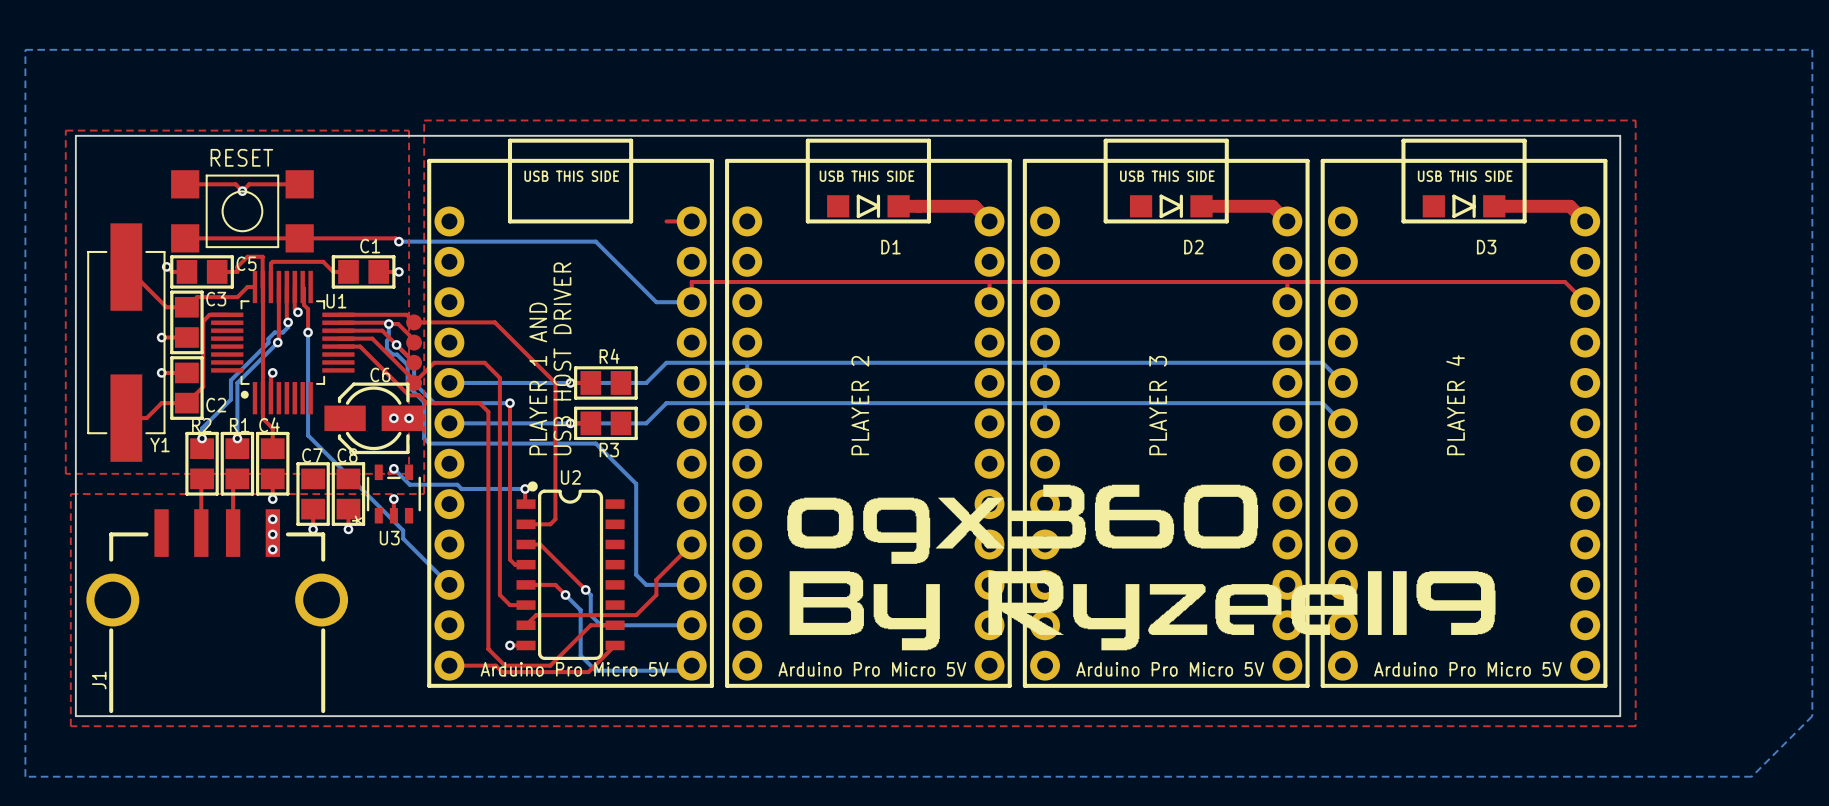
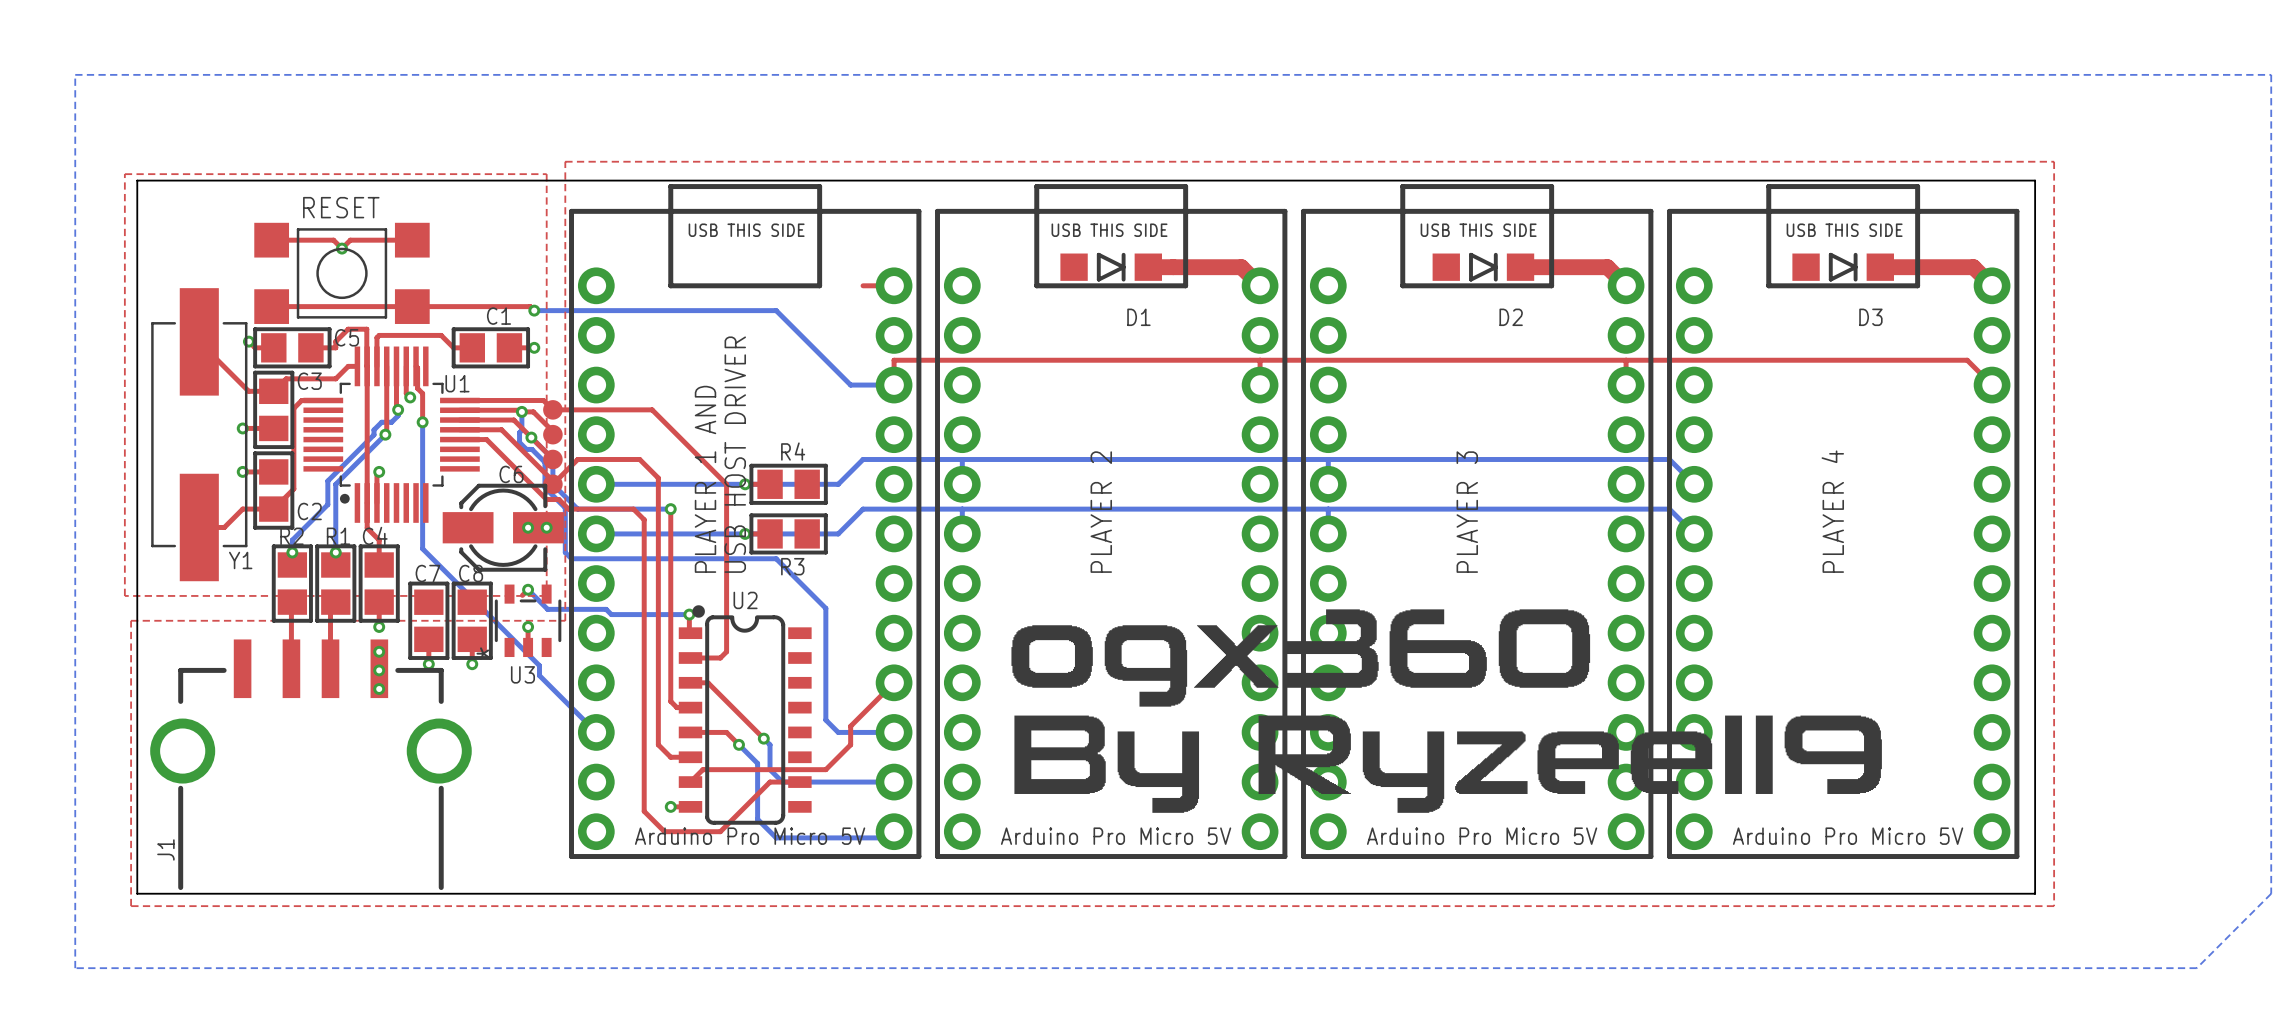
top track: (615, 645) (588, 672) (502, 672) (495, 665) (449, 665) -> none

